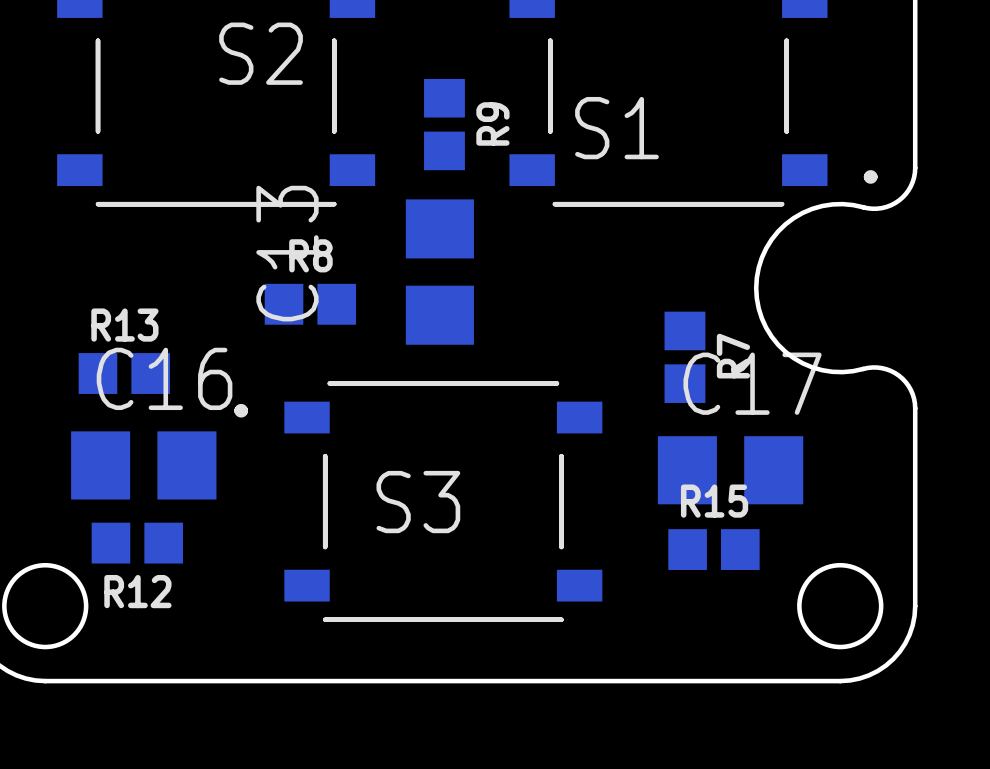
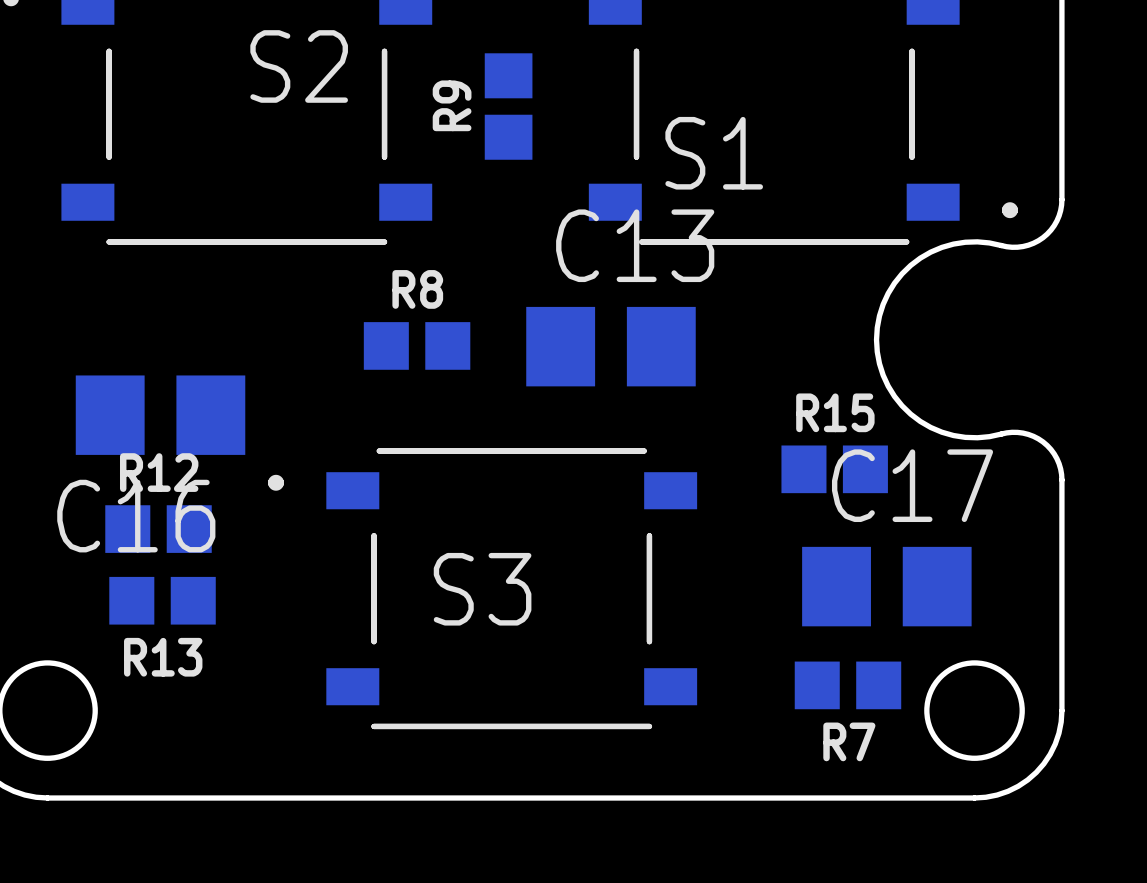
R9 name position: R9 (492, 123) -> R9 (452, 105)
R9 position: (444, 124) -> (508, 106)
C13 rotation: 0° (439, 272) -> 90° clockwise (610, 346)
C13 position: (439, 272) -> (610, 346)
R8 position: (310, 304) -> (417, 345)
R13 name position: R13 (124, 325) -> R13 (163, 657)
R7 rotation: 0° (684, 357) -> 90° clockwise (847, 685)
R7 position: (684, 357) -> (847, 685)
R13 position: (124, 373) -> (162, 600)
C16 name position: C16 (164, 378) -> C16 (136, 516)
C16 position: (143, 465) -> (160, 415)
C17 position: (730, 470) -> (886, 586)
R12 position: (137, 543) -> (158, 529)
R15 position: (713, 549) -> (834, 469)
R12 name position: R12 (137, 591) -> R12 (159, 472)

